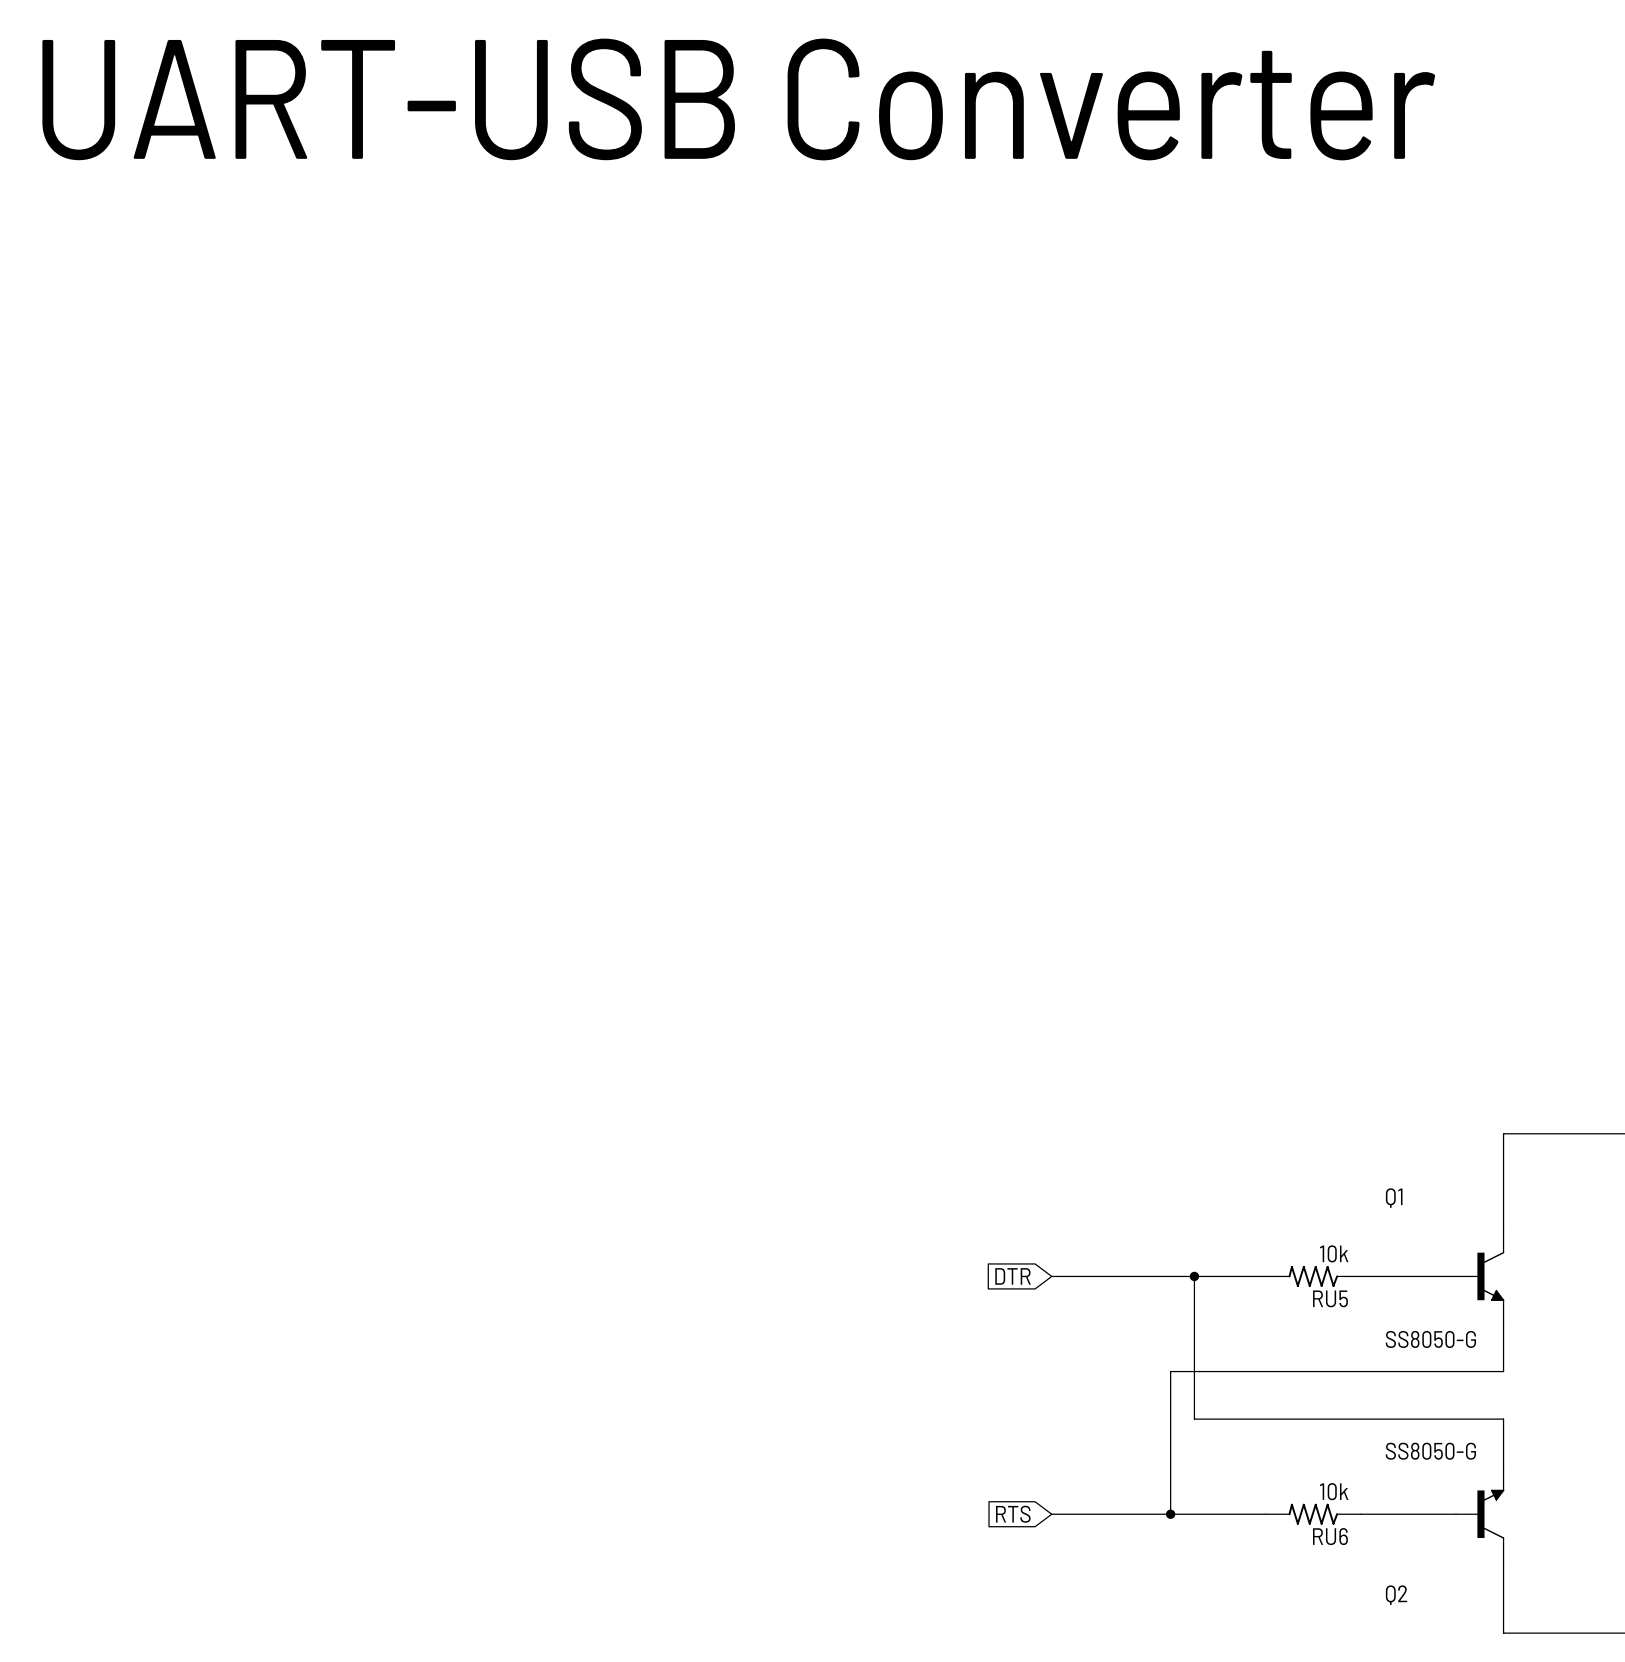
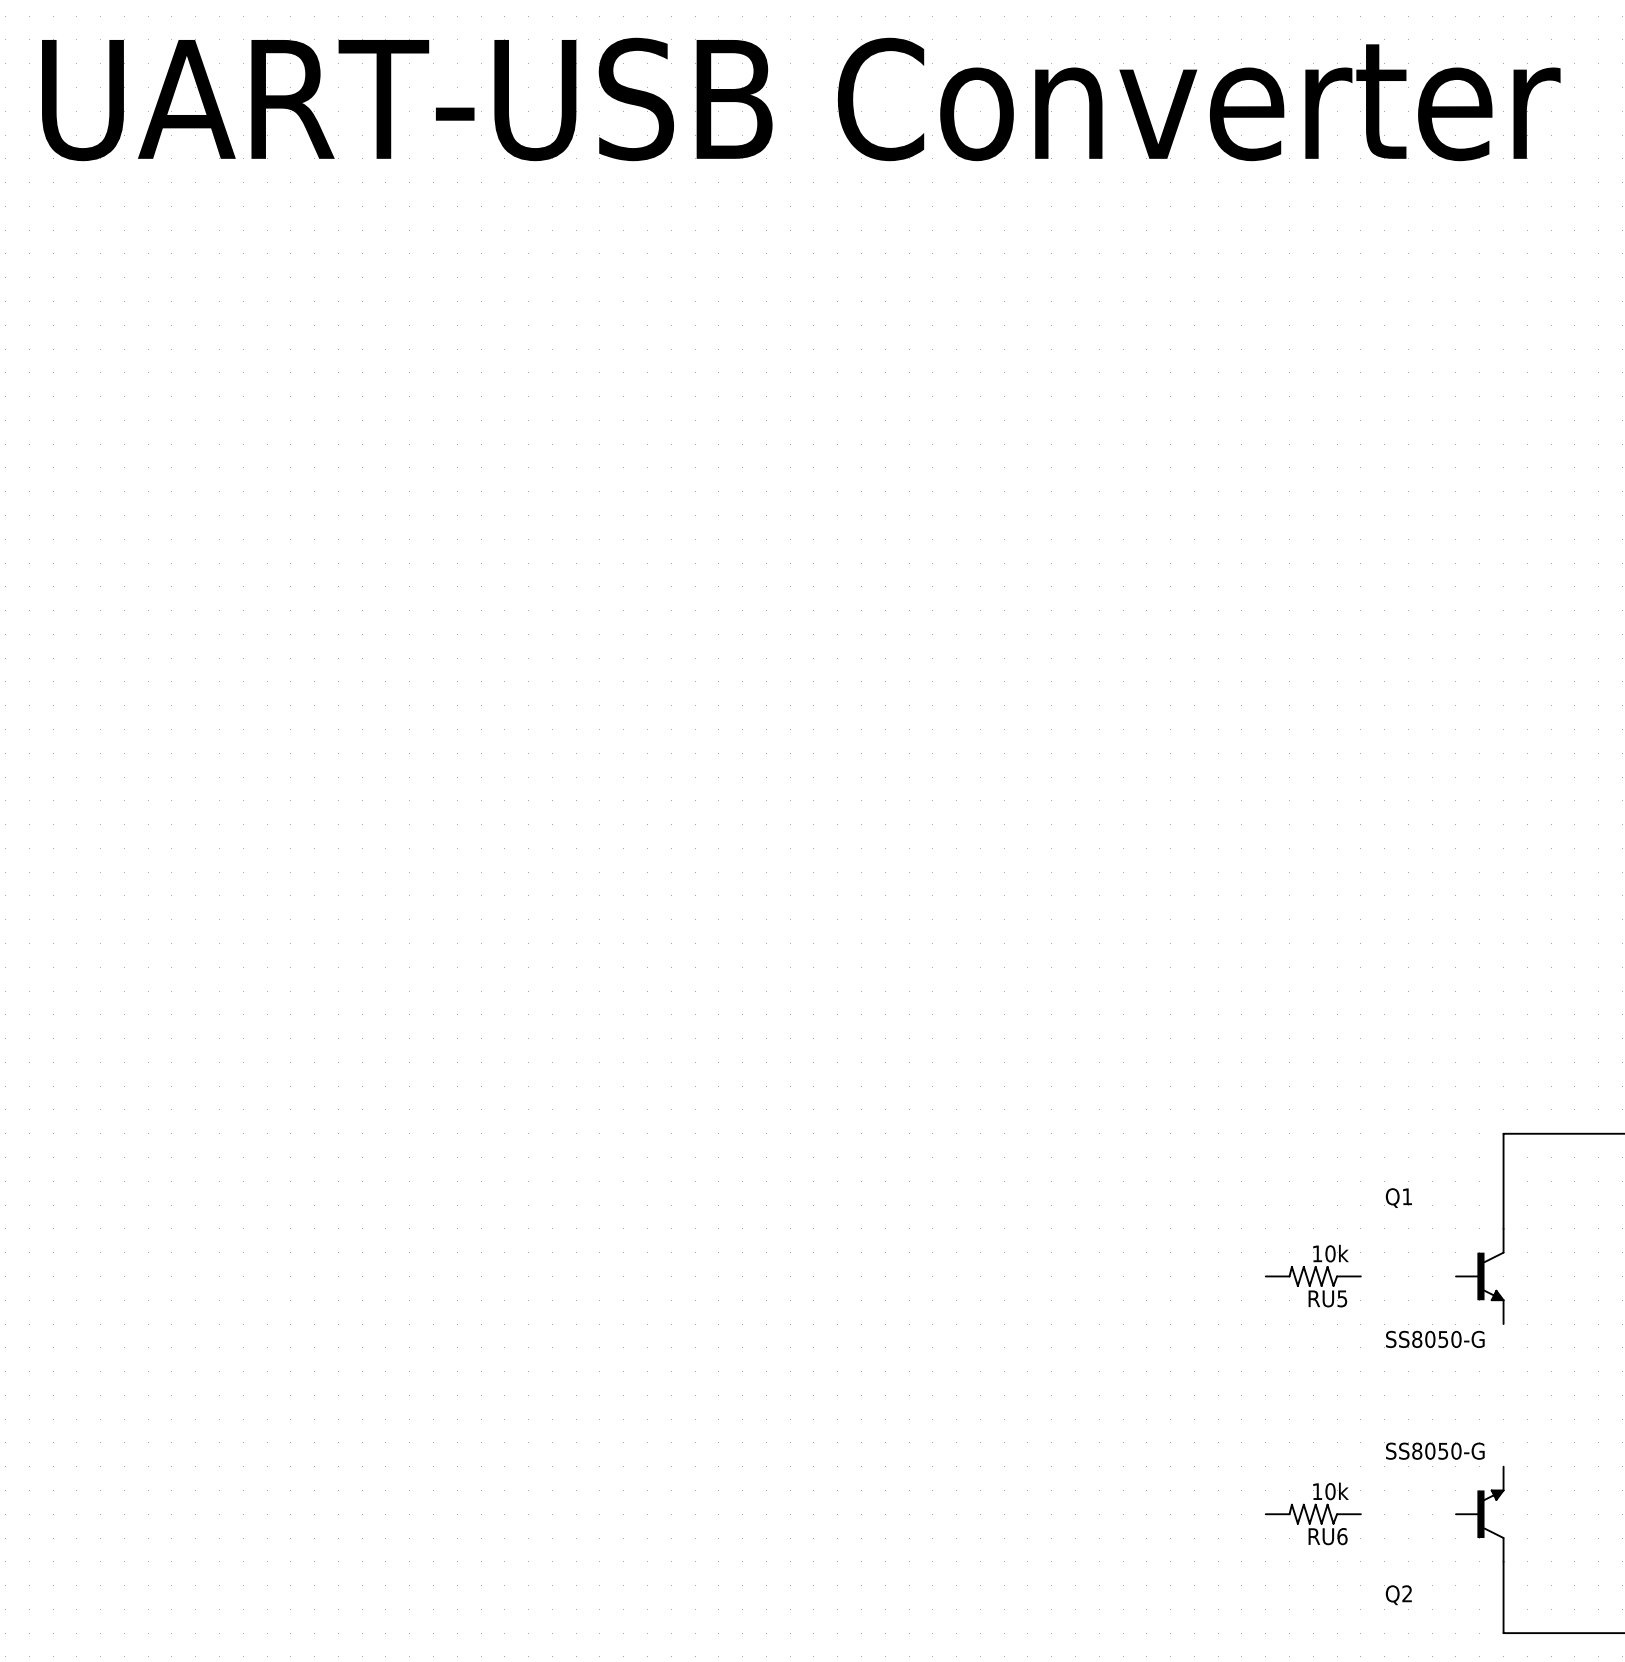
global label: DTR (1013, 1276) -> none
wire: (1051, 1276) (1265, 1276) -> none
wire: (1194, 1276) (1194, 1419) (1503, 1419) (1503, 1466) -> none
junction: (1194, 1276) -> none
wire: (1360, 1276) (1455, 1276) -> none
wire: (1503, 1324) (1503, 1371) (1170, 1371) (1170, 1514) -> none
global label: RTS (1013, 1514) -> none
wire: (1051, 1514) (1265, 1514) -> none
junction: (1170, 1514) -> none
wire: (1360, 1514) (1455, 1514) -> none

